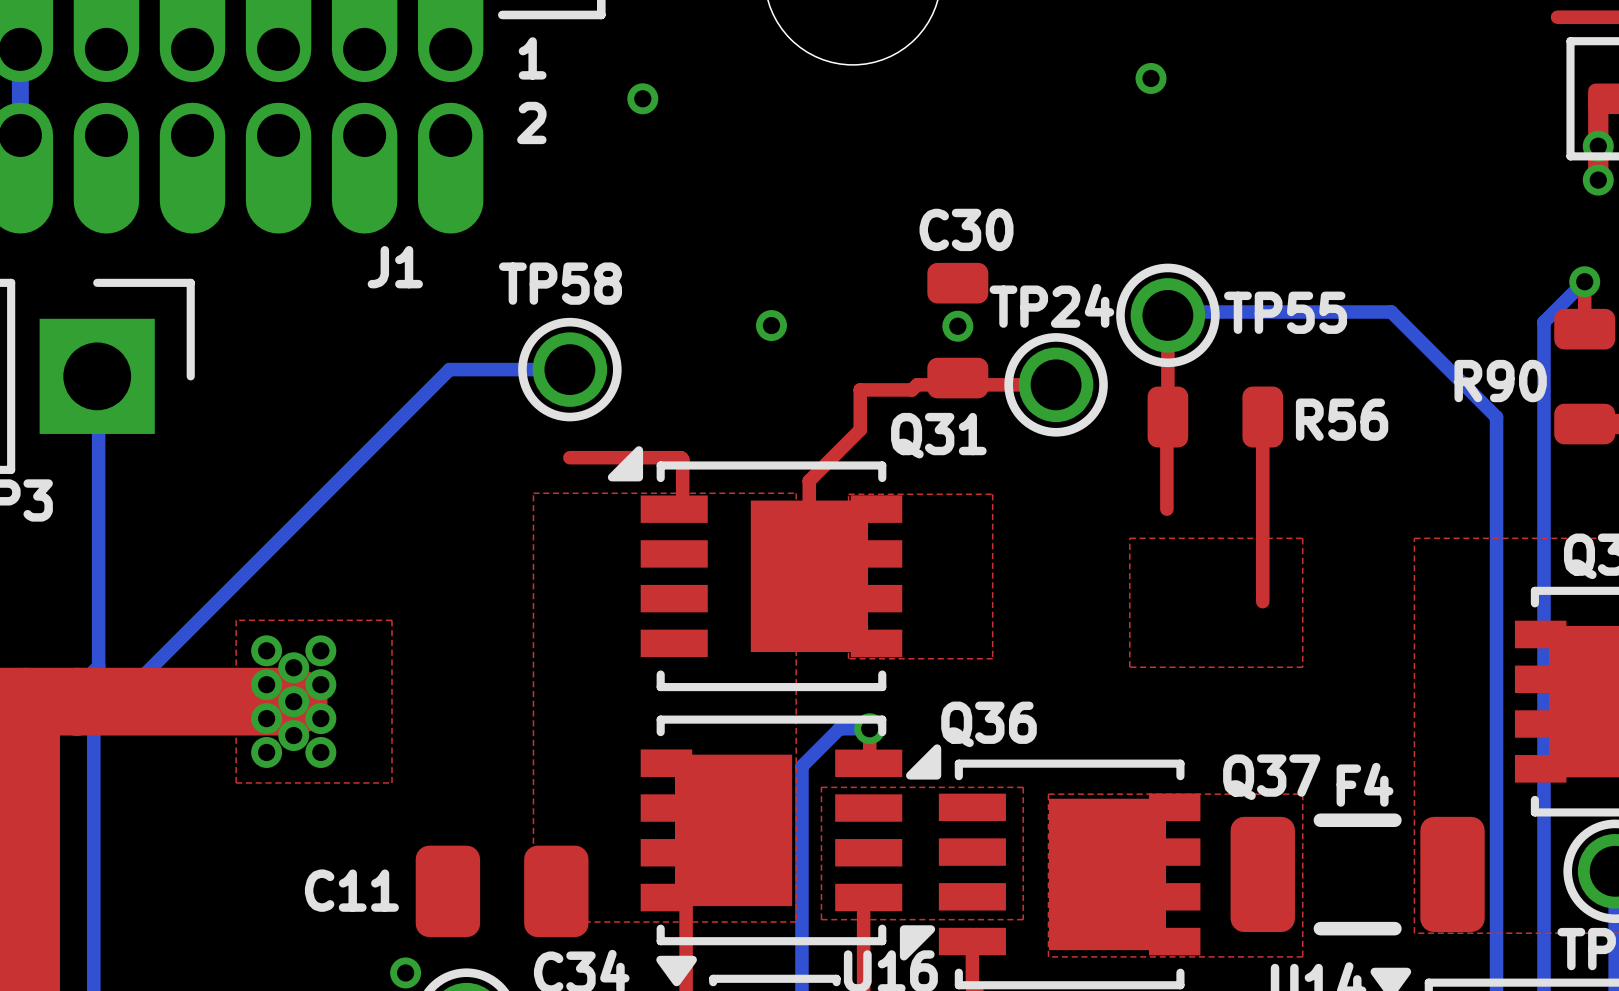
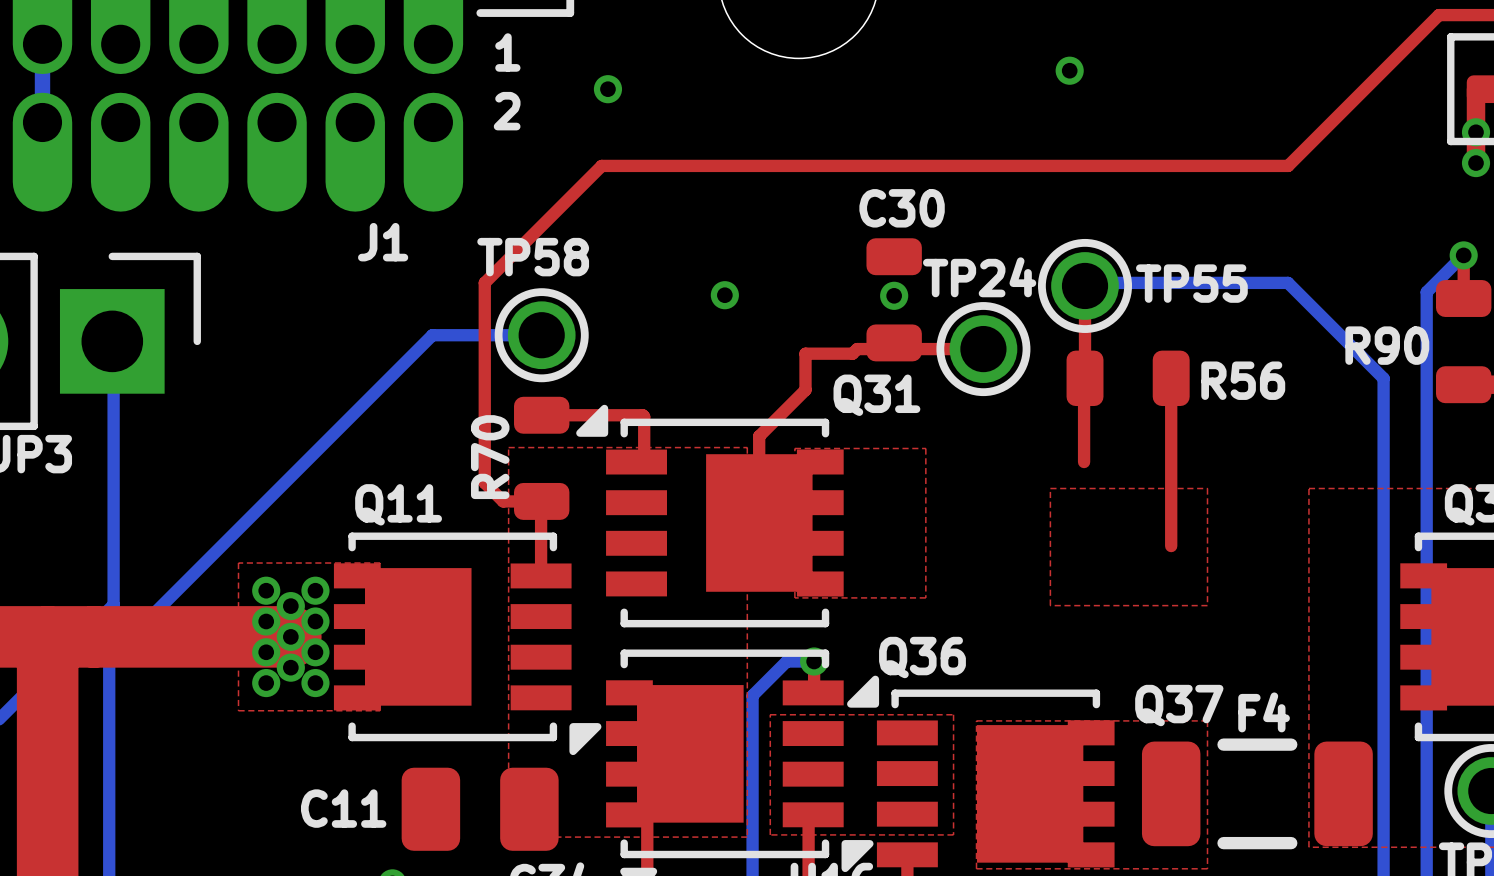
top track: none -> (1439, 15) (1288, 165) (601, 165) (484, 282) (484, 482) (503, 501) (541, 501)
R70: none -> (541, 458)
top track: none -> (541, 502) (541, 575)
Q11: none -> (467, 643)

